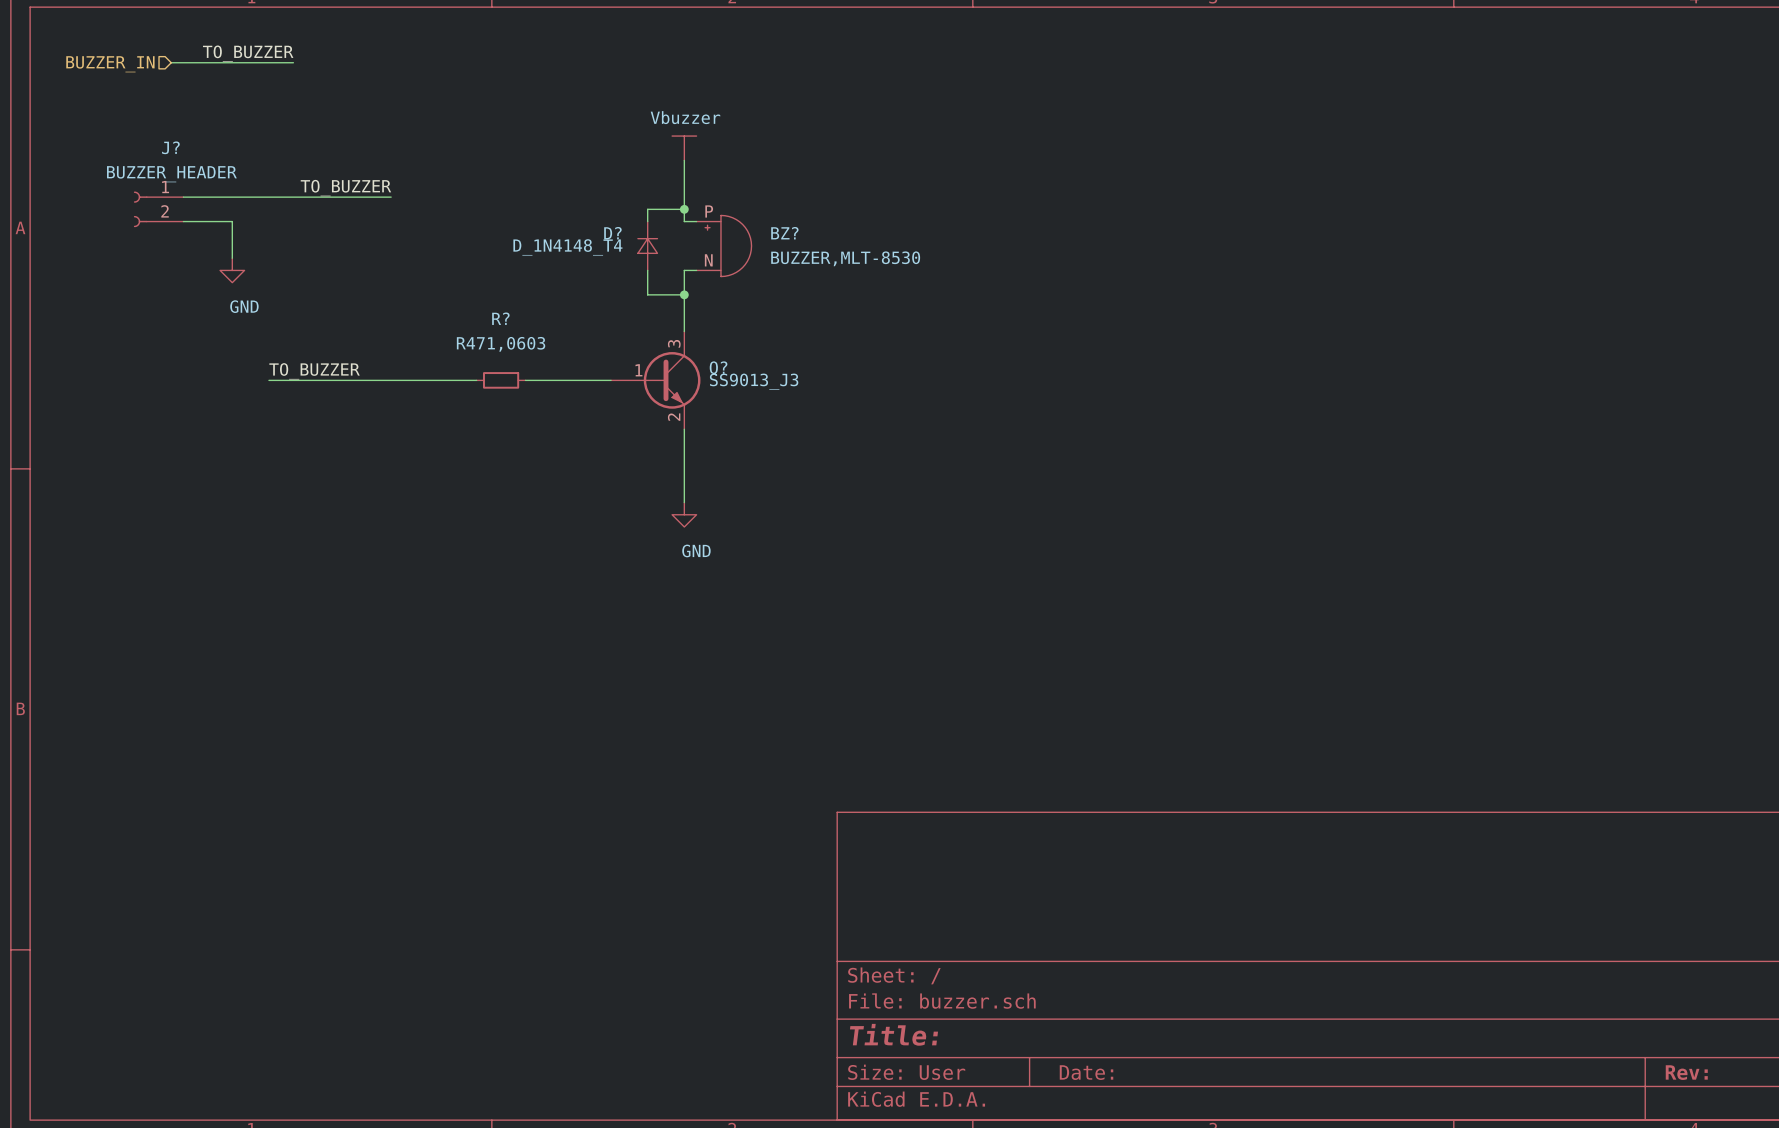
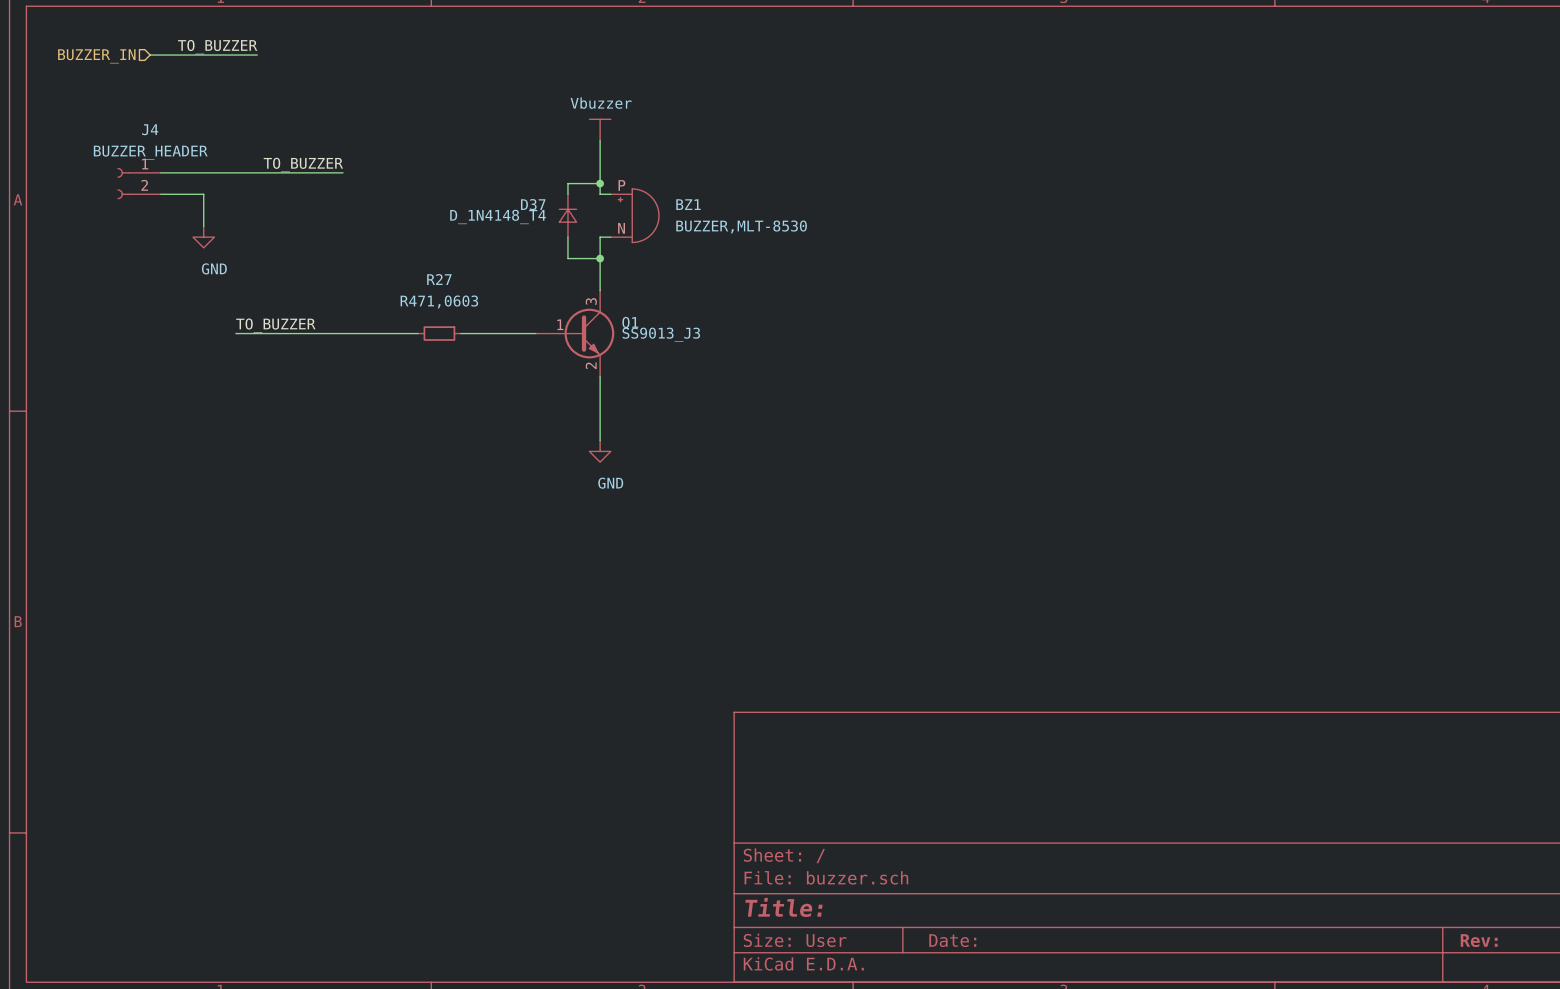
J? name: J? (170, 147) -> J4 (150, 129)
D? name: D? (612, 233) -> D37 (533, 204)
BZ? name: BZ? (784, 233) -> BZ1 (688, 204)
R? name: R? (500, 318) -> R27 (439, 279)
Q? name: Q? (718, 368) -> Q1 (630, 323)

